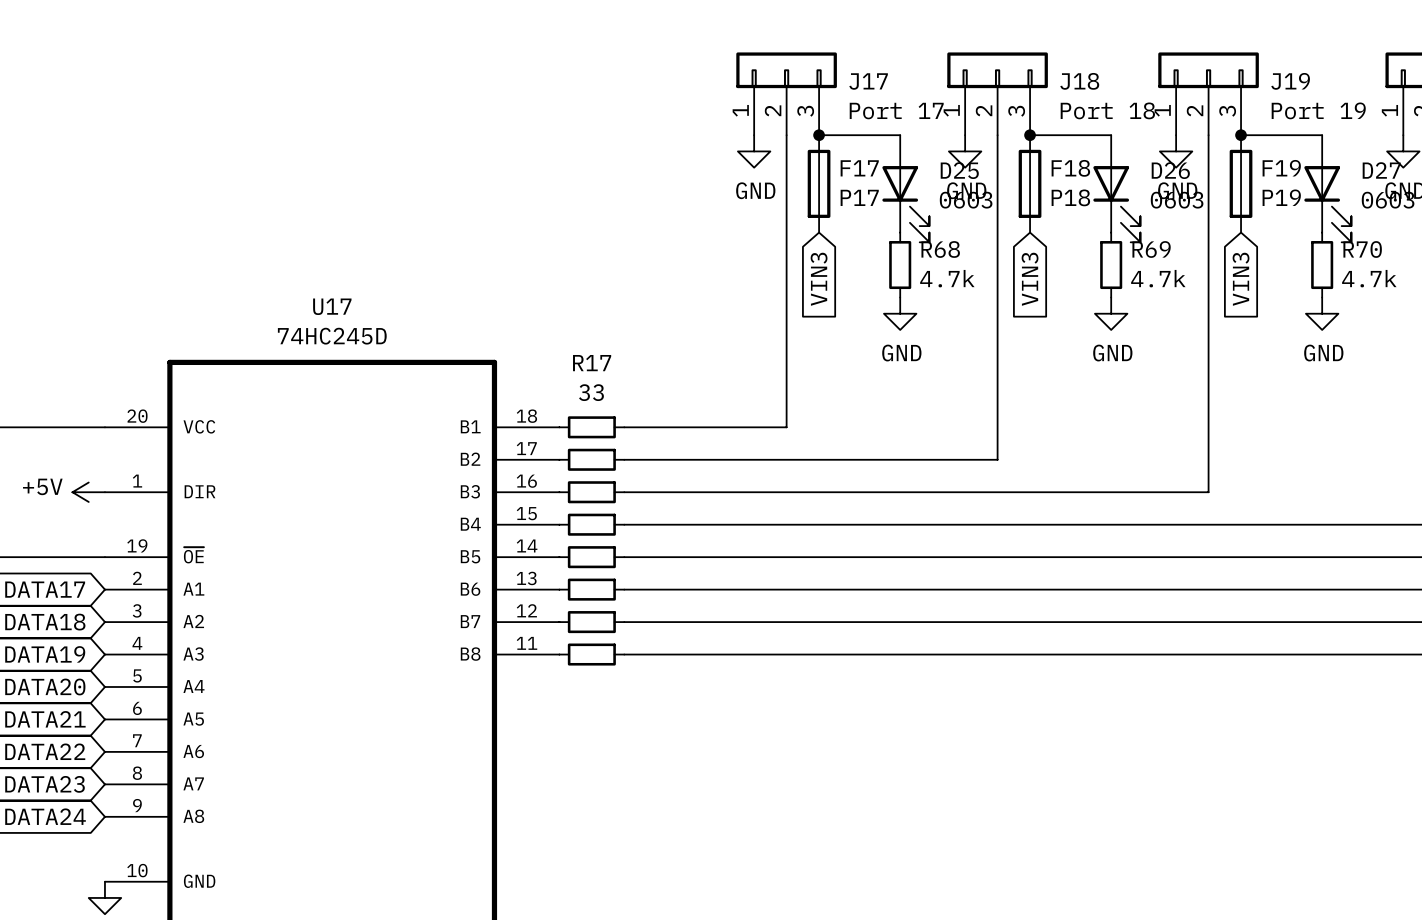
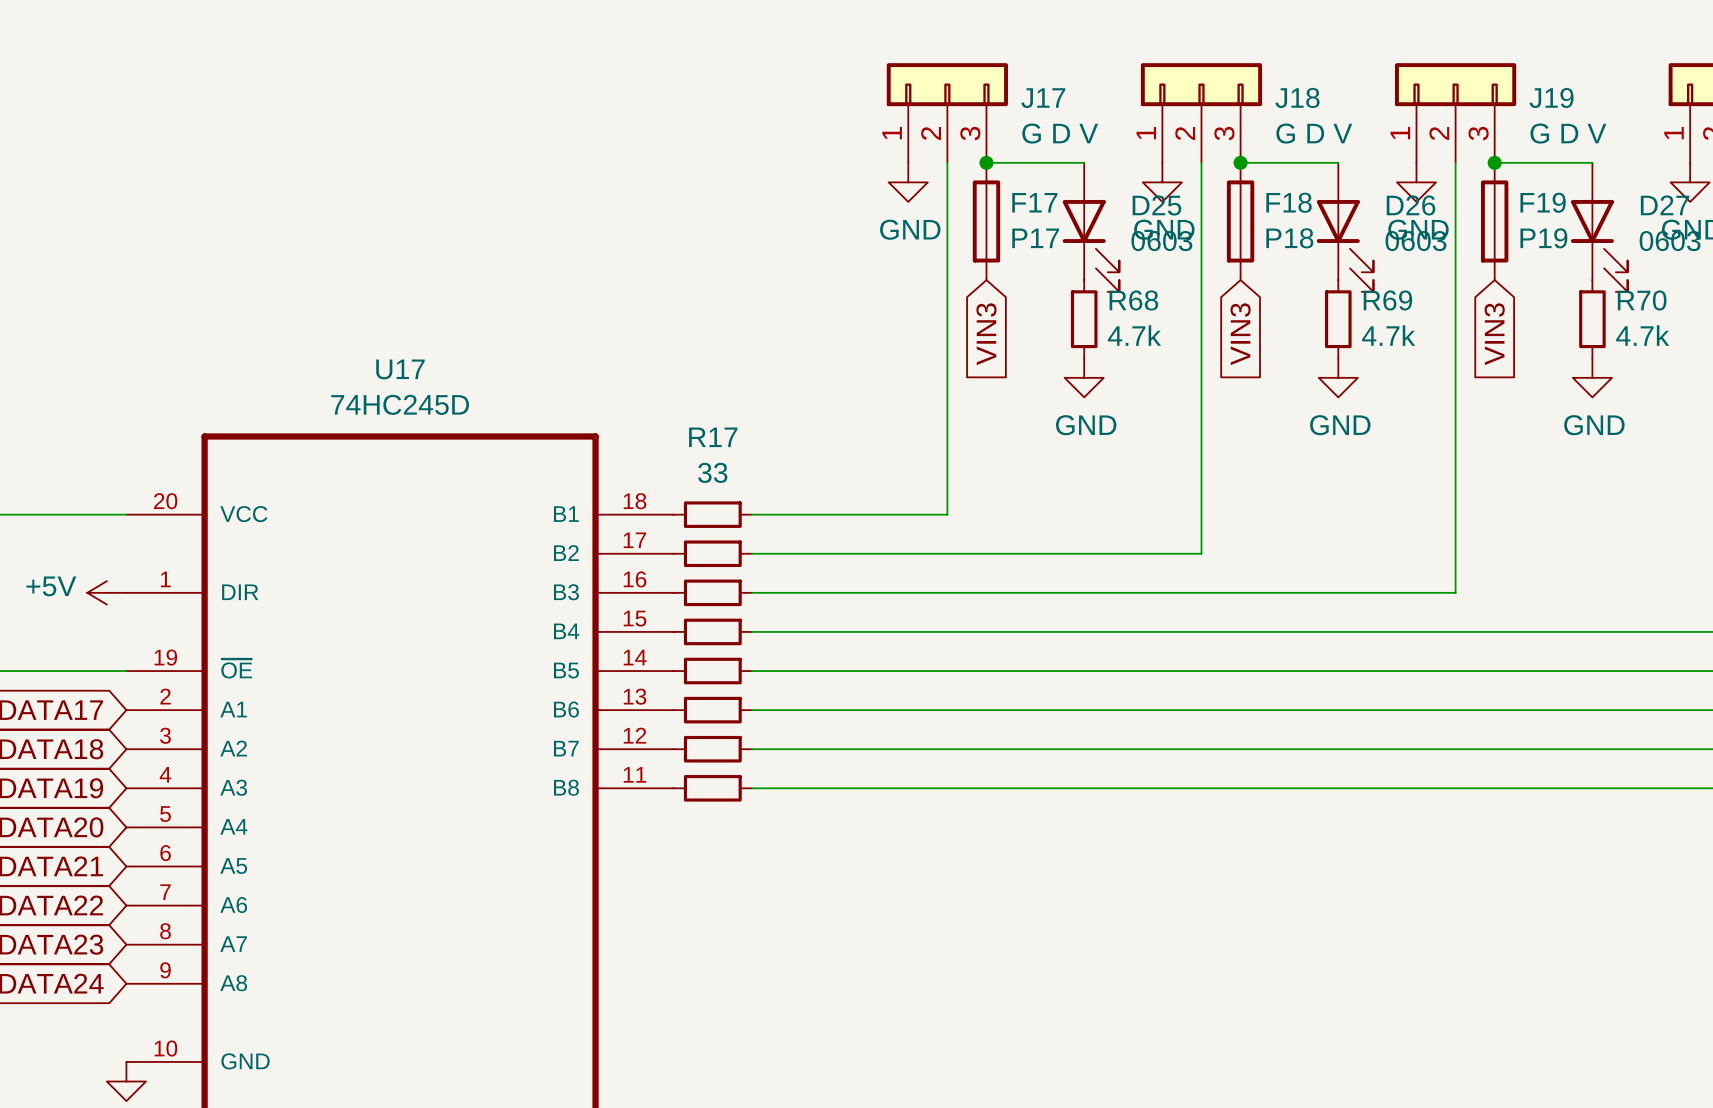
J18 value: Port 18 (1107, 110) -> G D V (1314, 133)
J19 value: Port 19 (1318, 110) -> G D V (1568, 133)
J17 value: Port 17 (896, 111) -> G D V (1060, 133)

